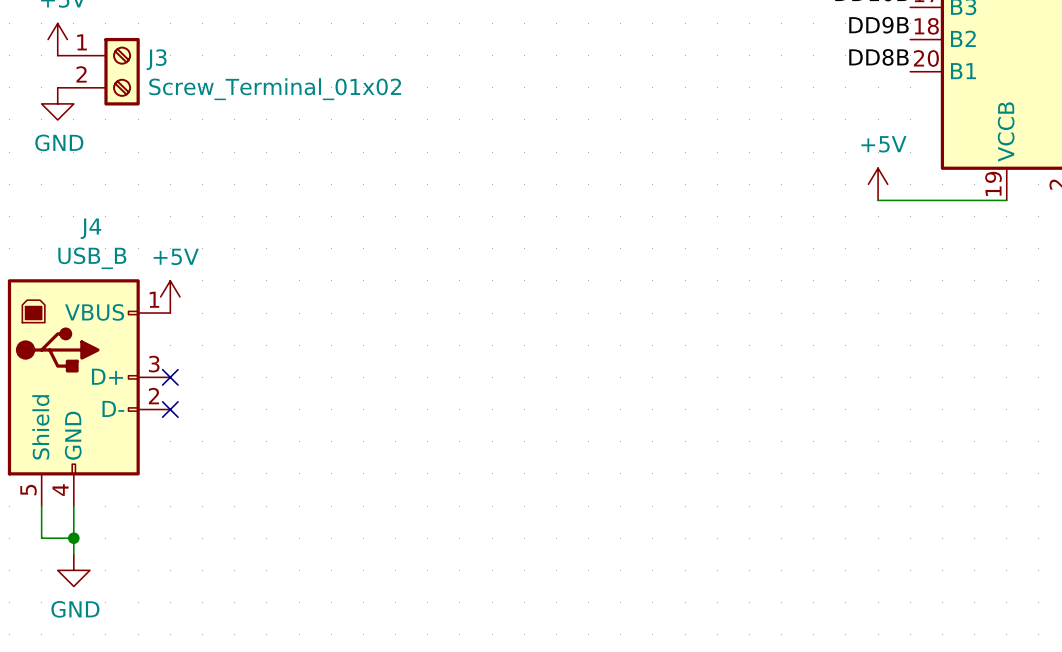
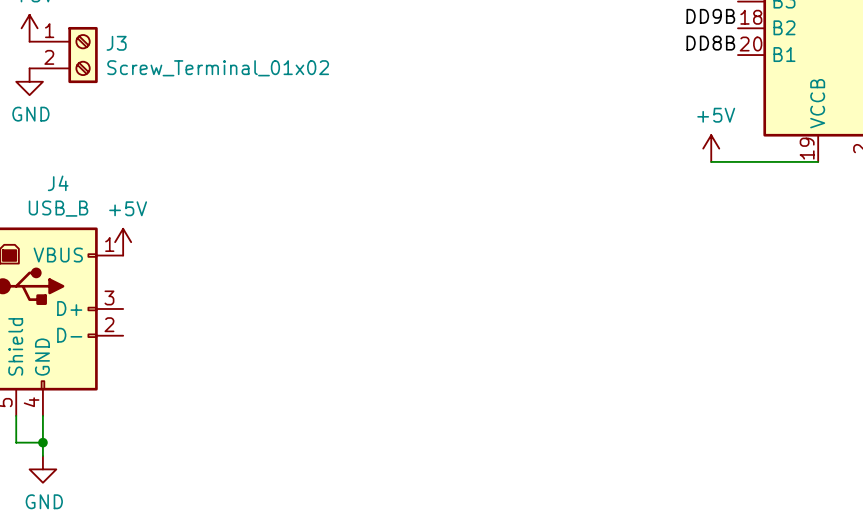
no-connect mark: (170, 377) -> none
no-connect mark: (170, 409) -> none

